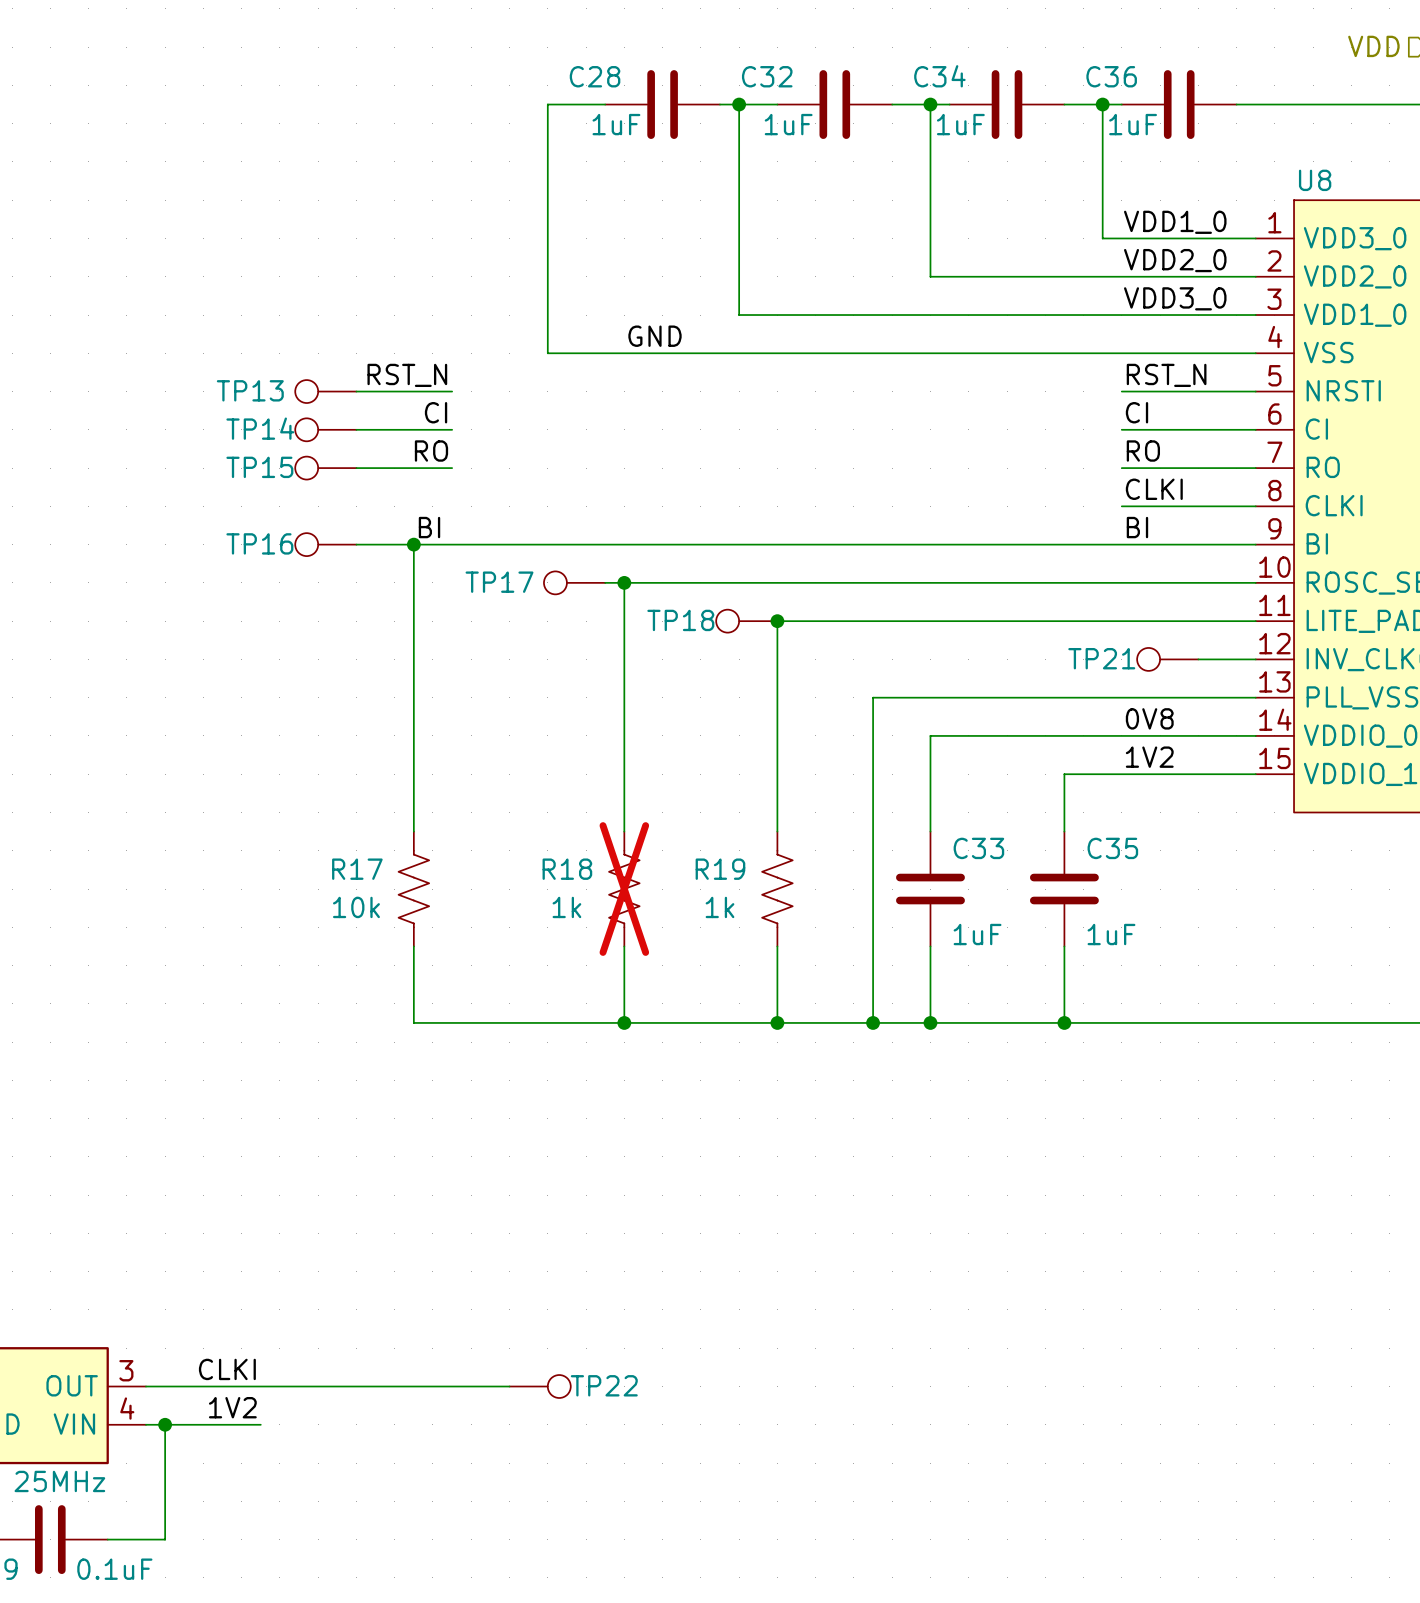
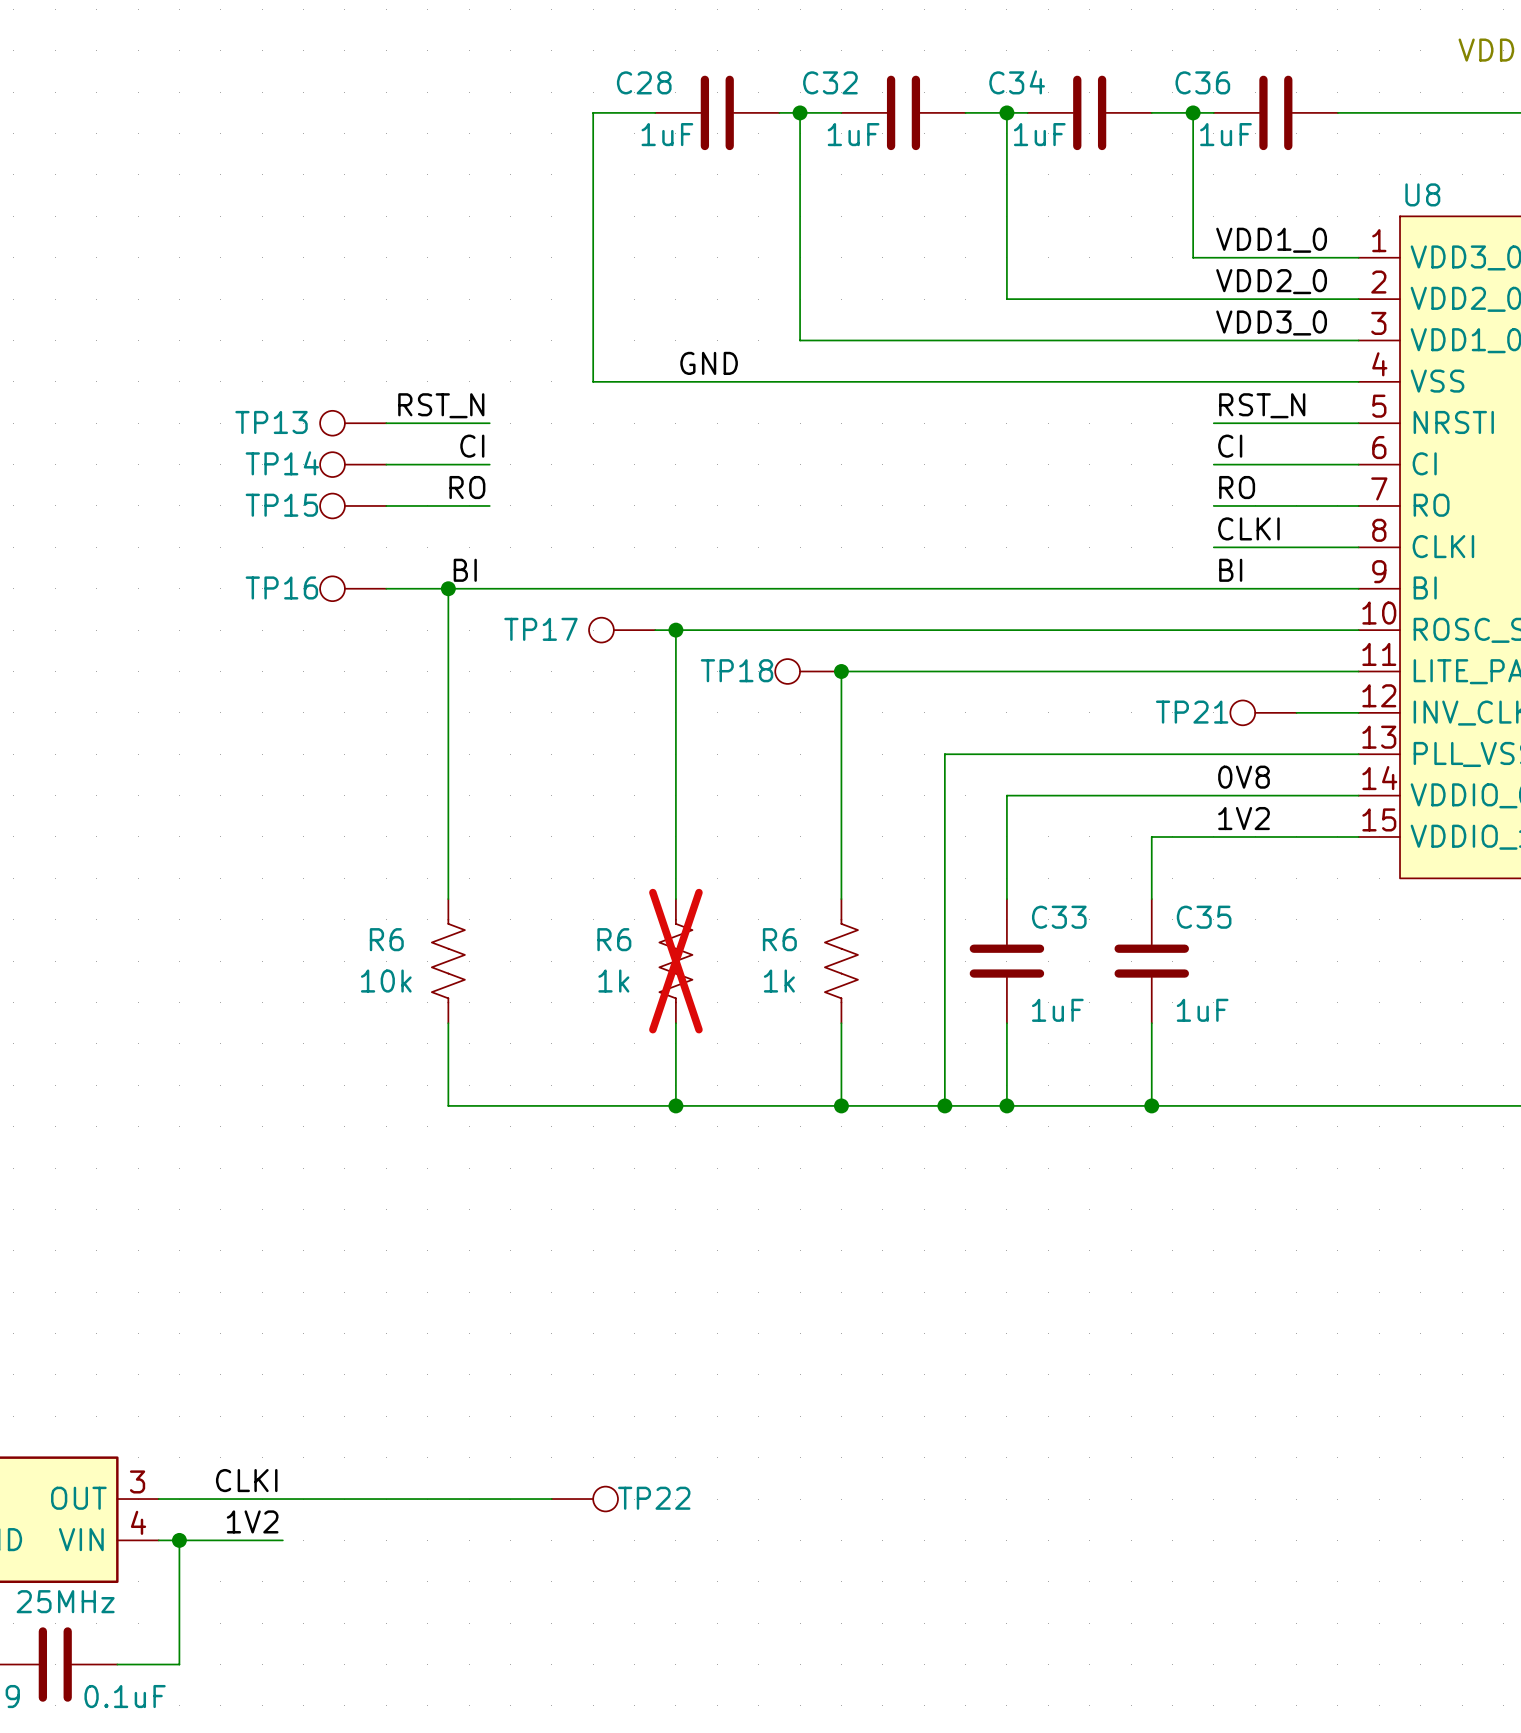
R17 name: R17 (357, 869) -> R6 (386, 939)
R18 name: R18 (567, 869) -> R6 (614, 939)
R19 name: R19 (720, 869) -> R6 (779, 939)

